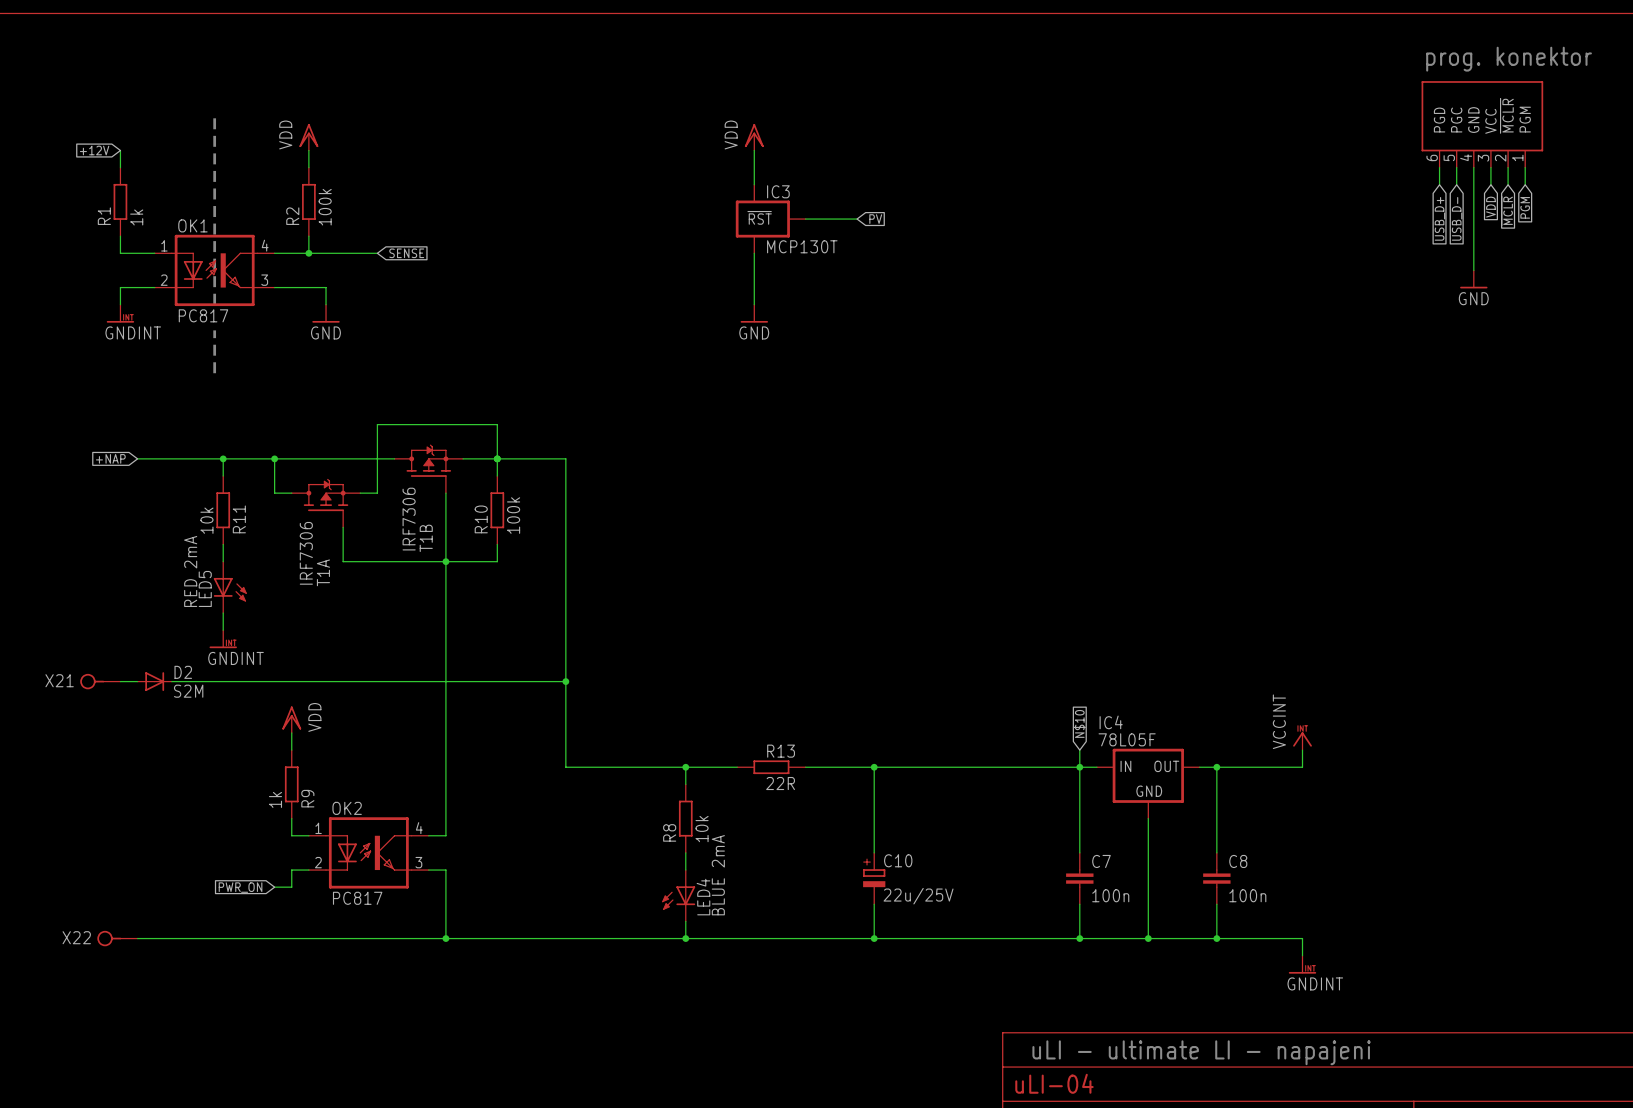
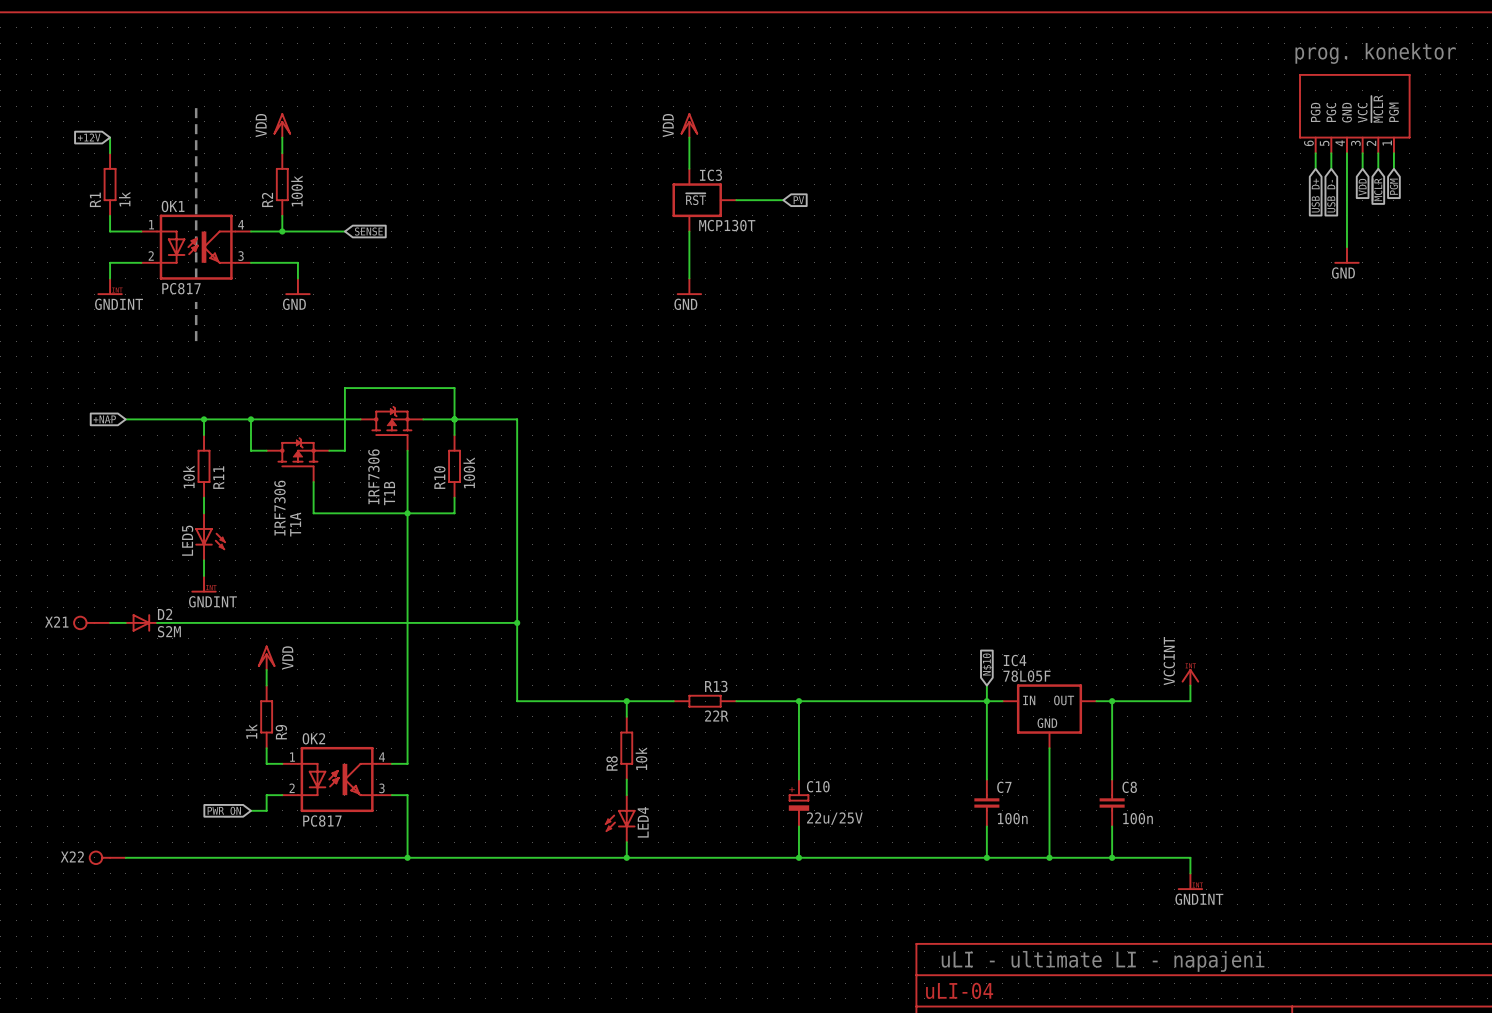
LED5 value: RED 2mA (190, 571) -> none
LED4 value: BLUE 2mA (718, 875) -> none

